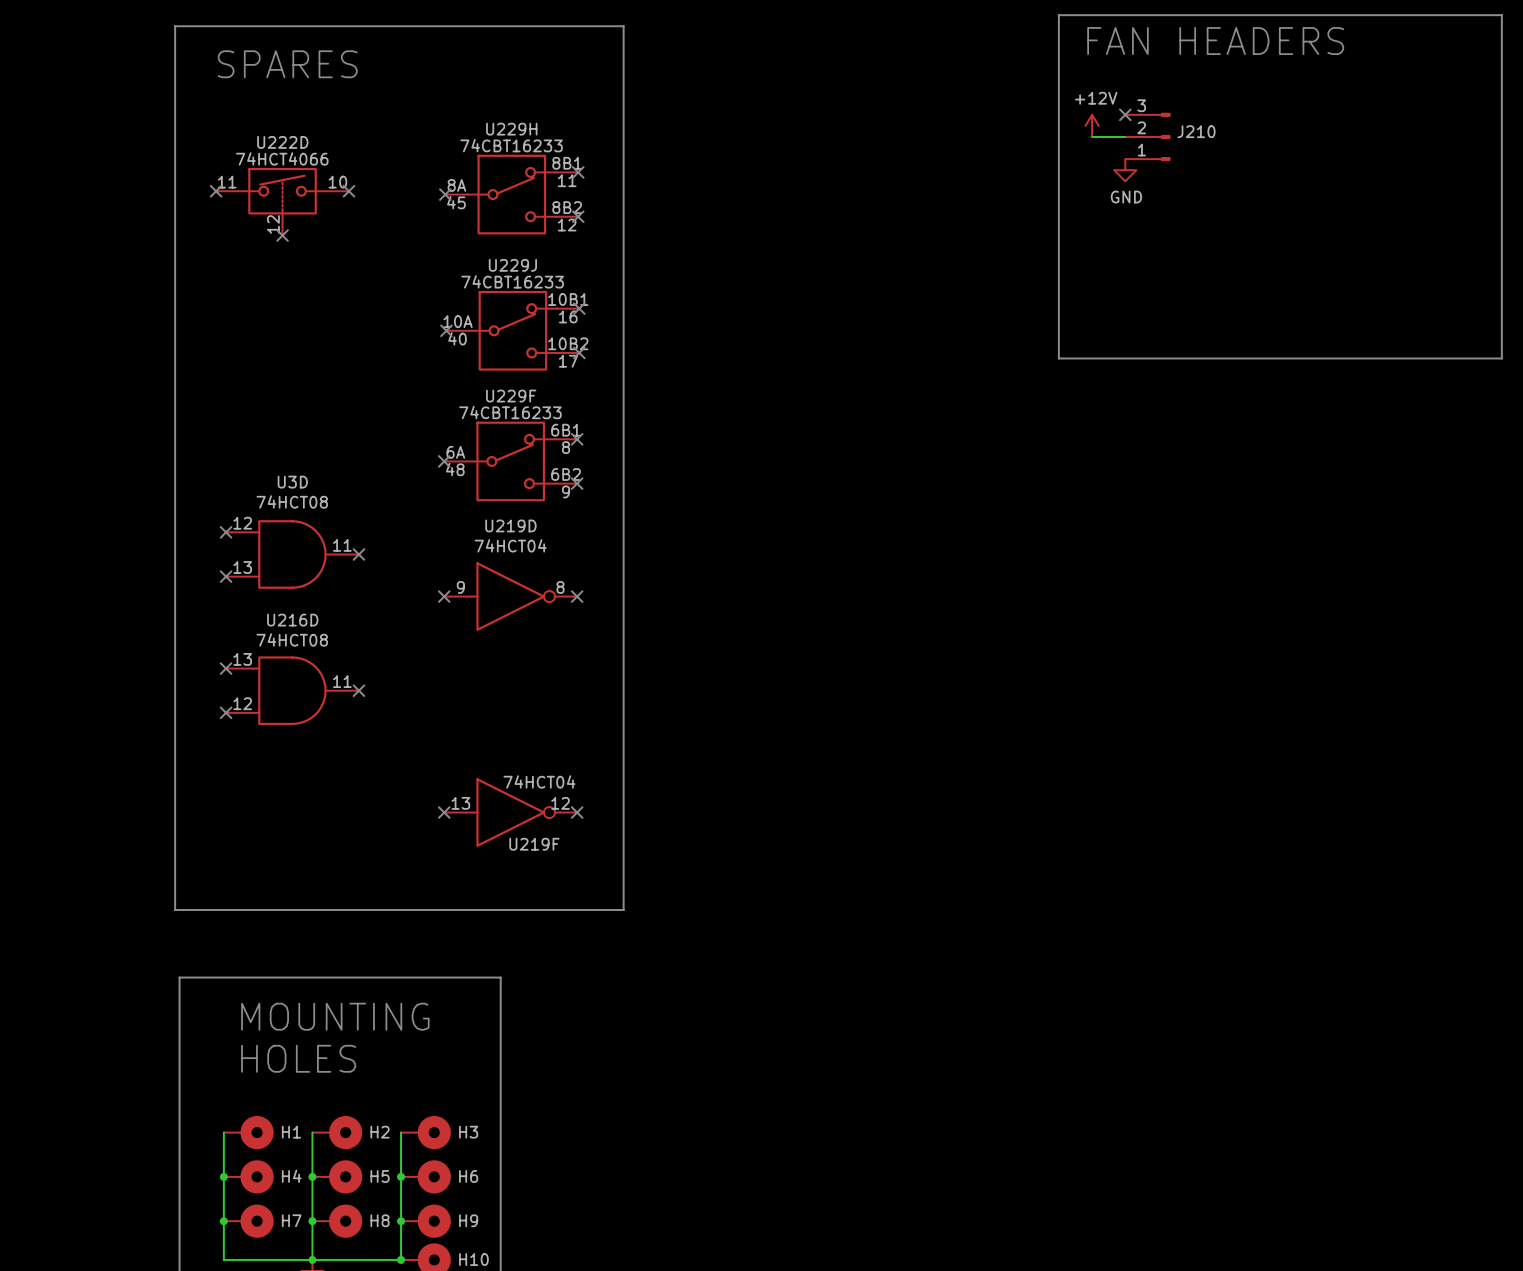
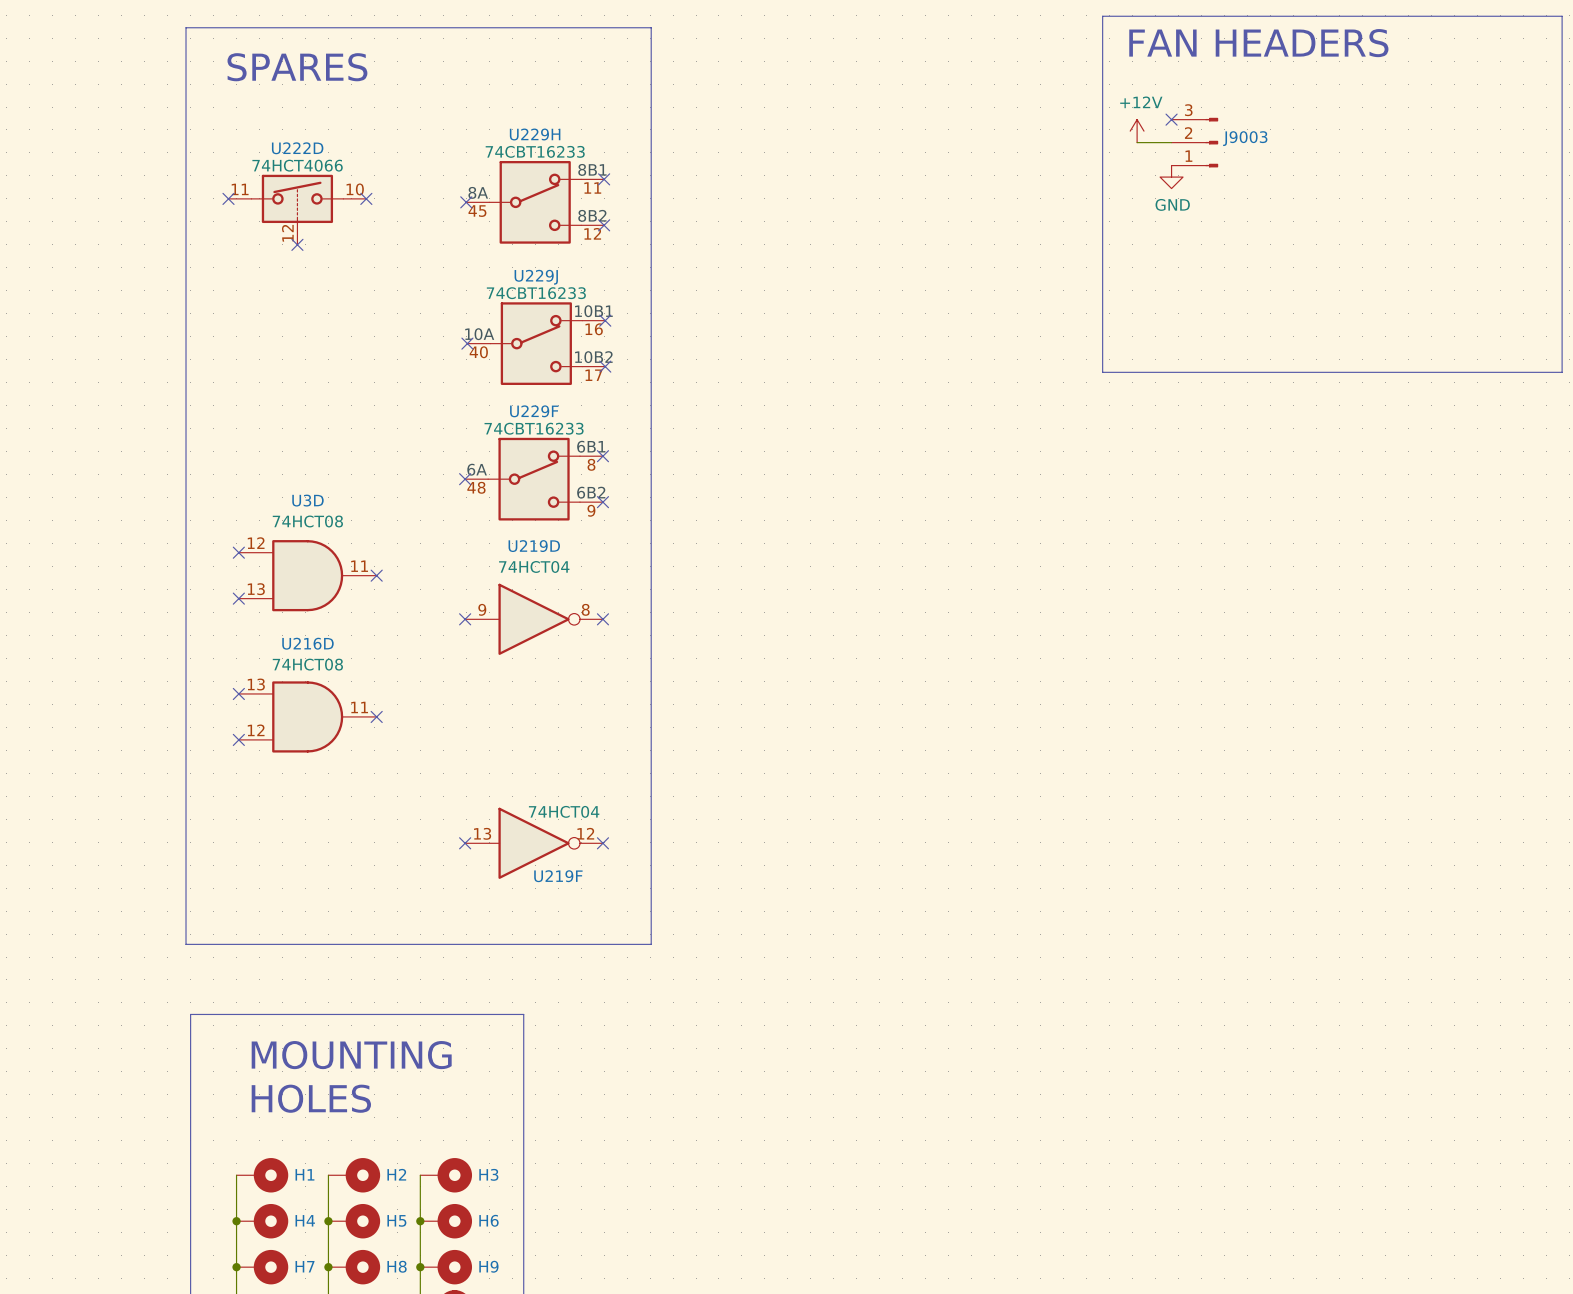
J210 name: J210 (1196, 131) -> J9003 (1245, 138)

